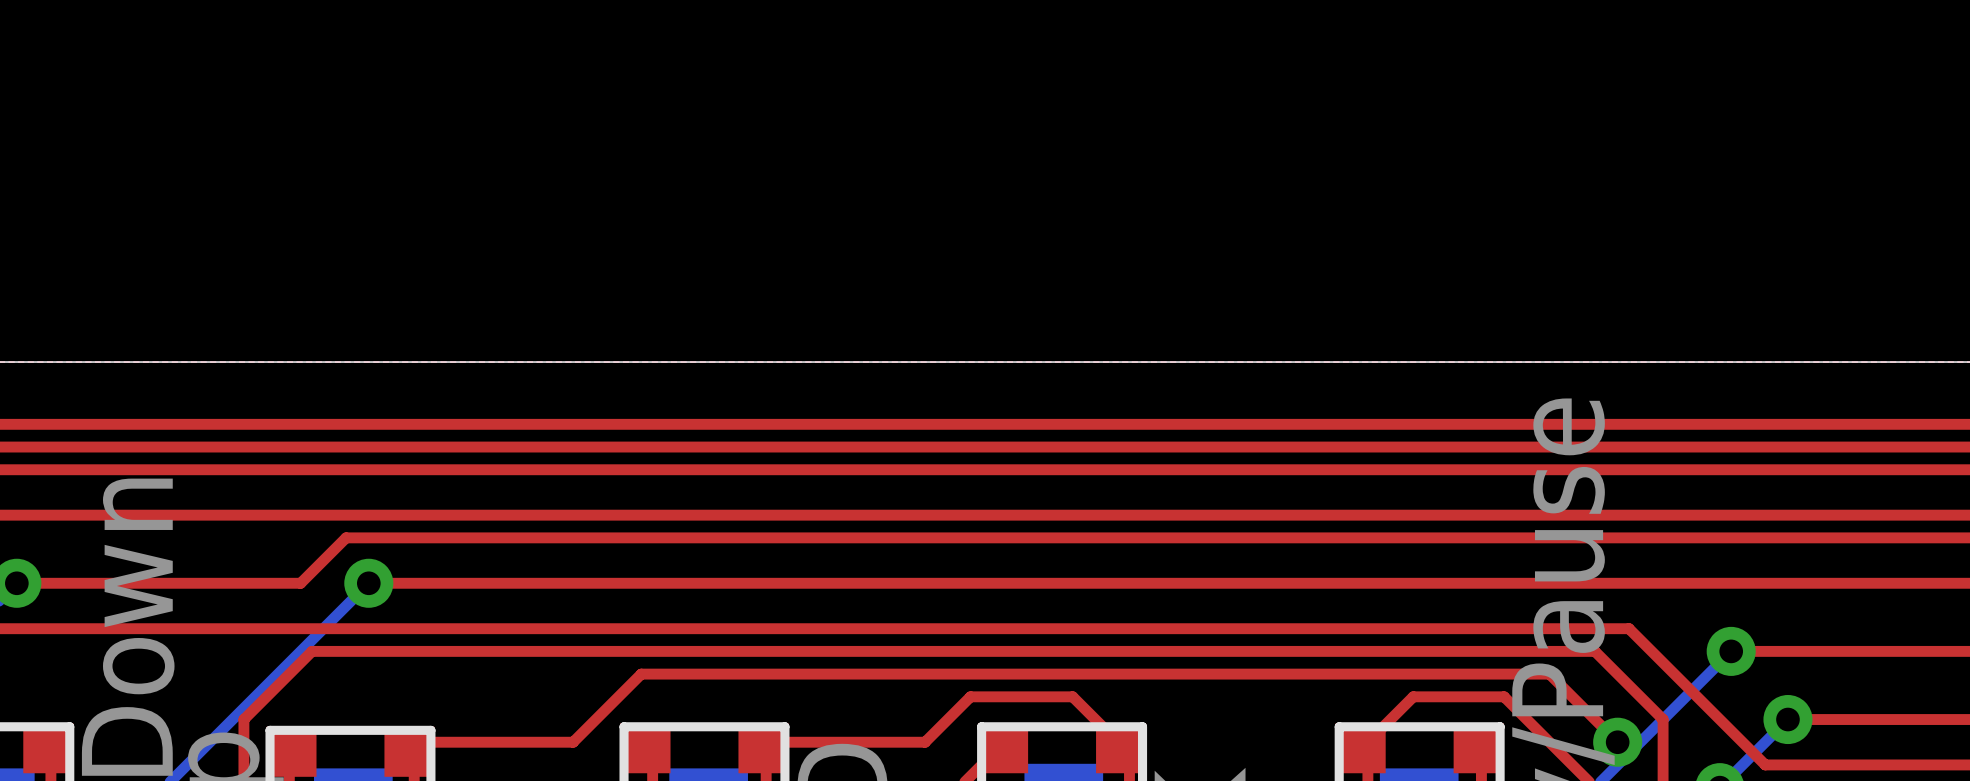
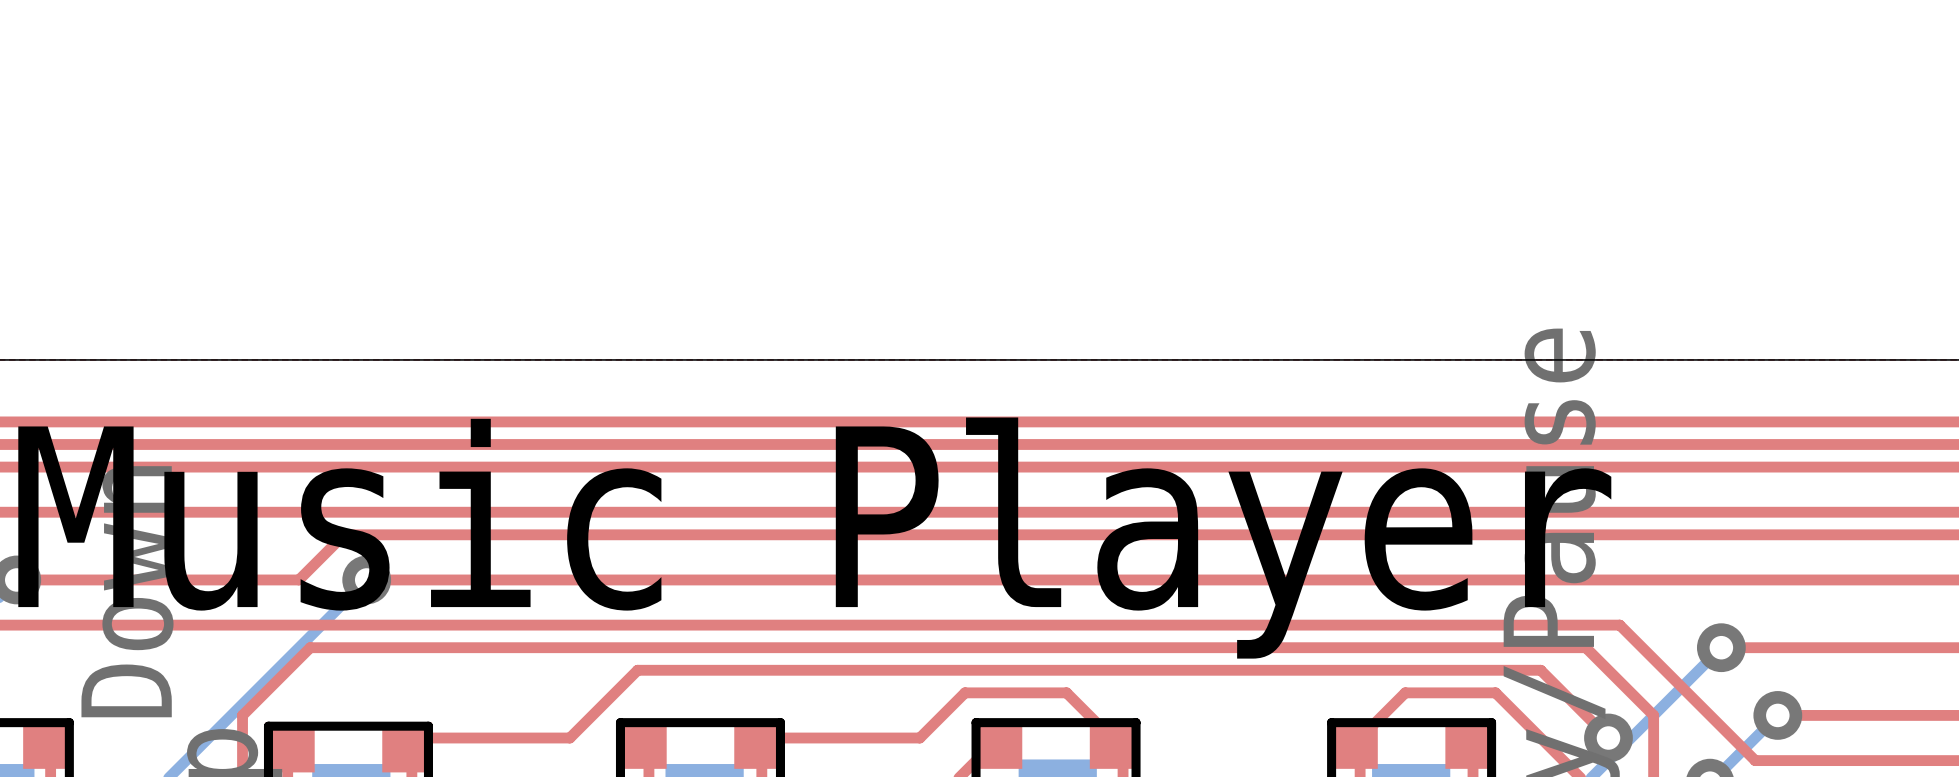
text: none -> Music Player (814, 538)

